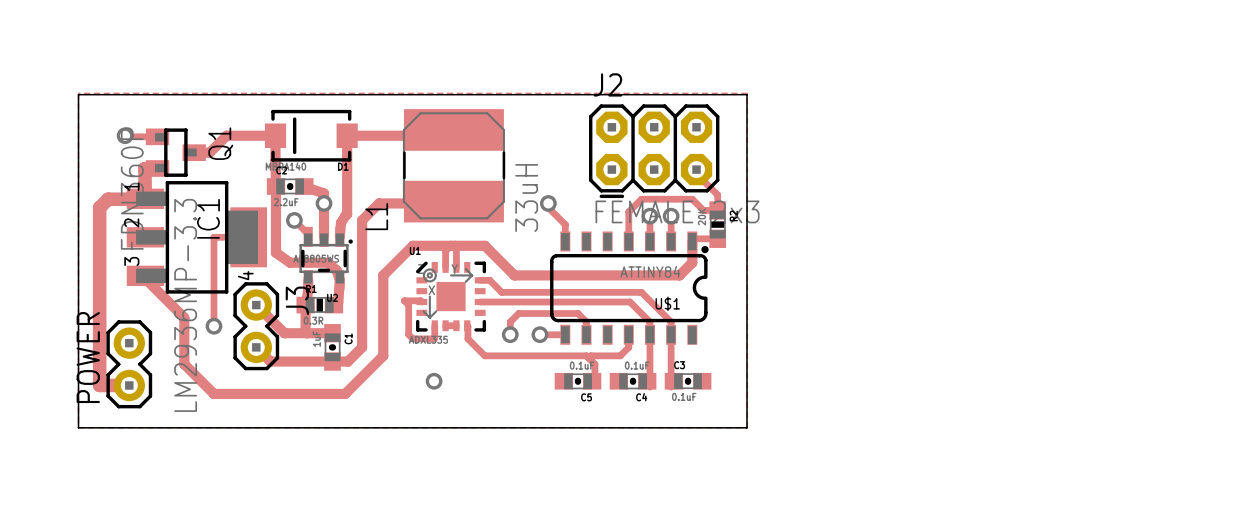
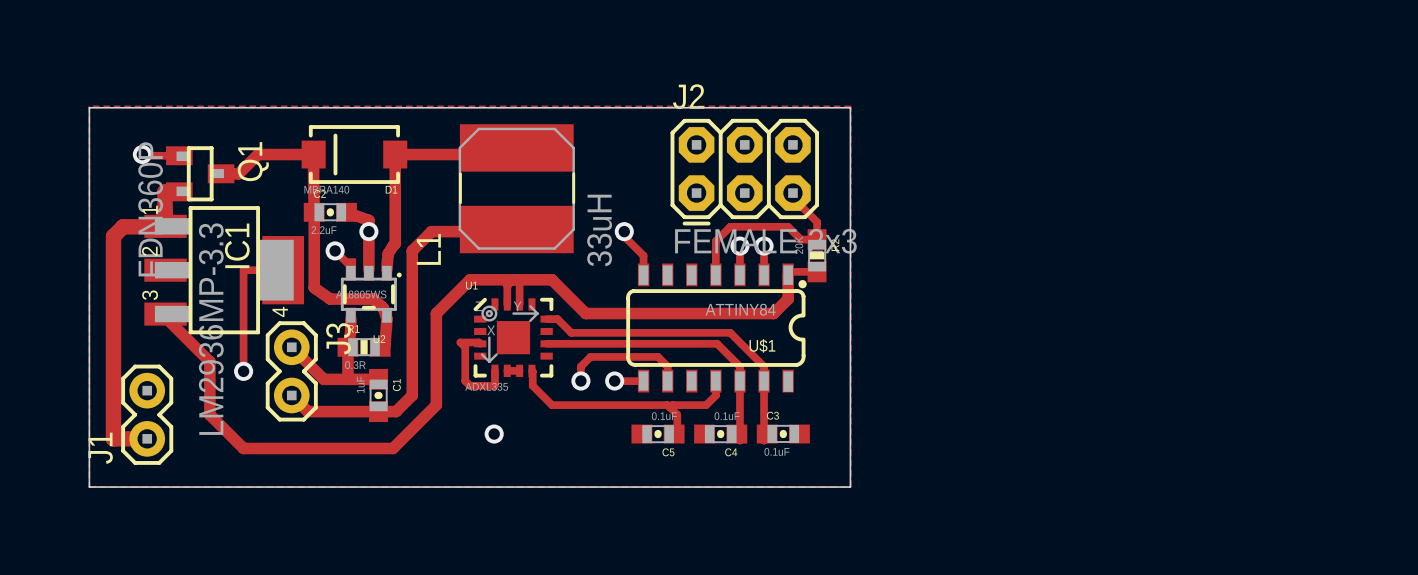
POWER name: POWER (88, 357) -> J1 (100, 448)

